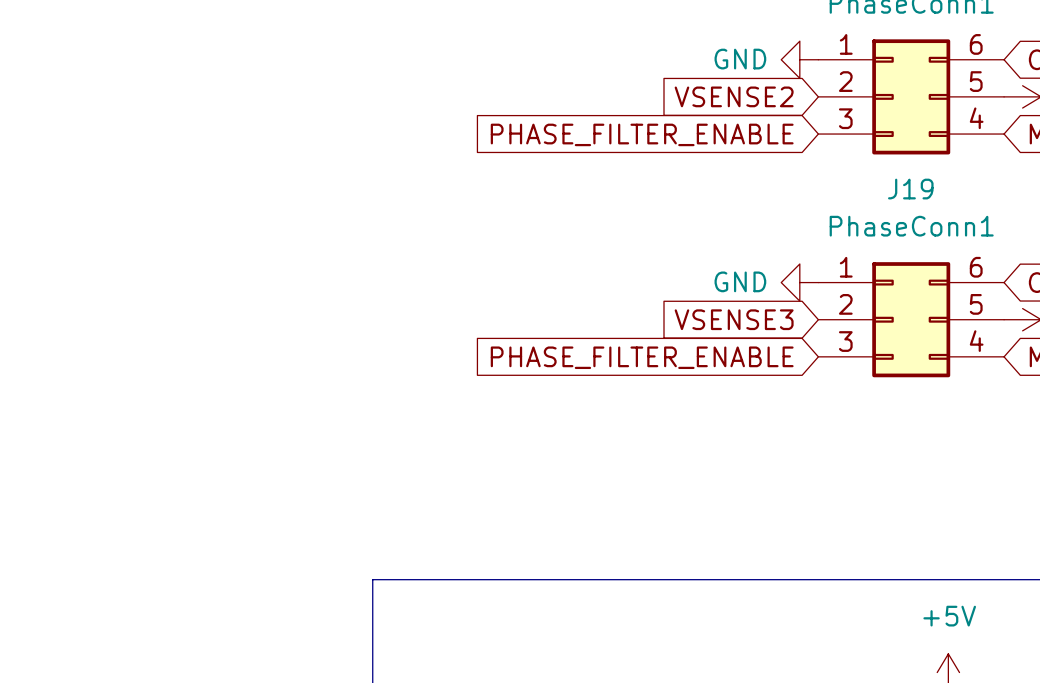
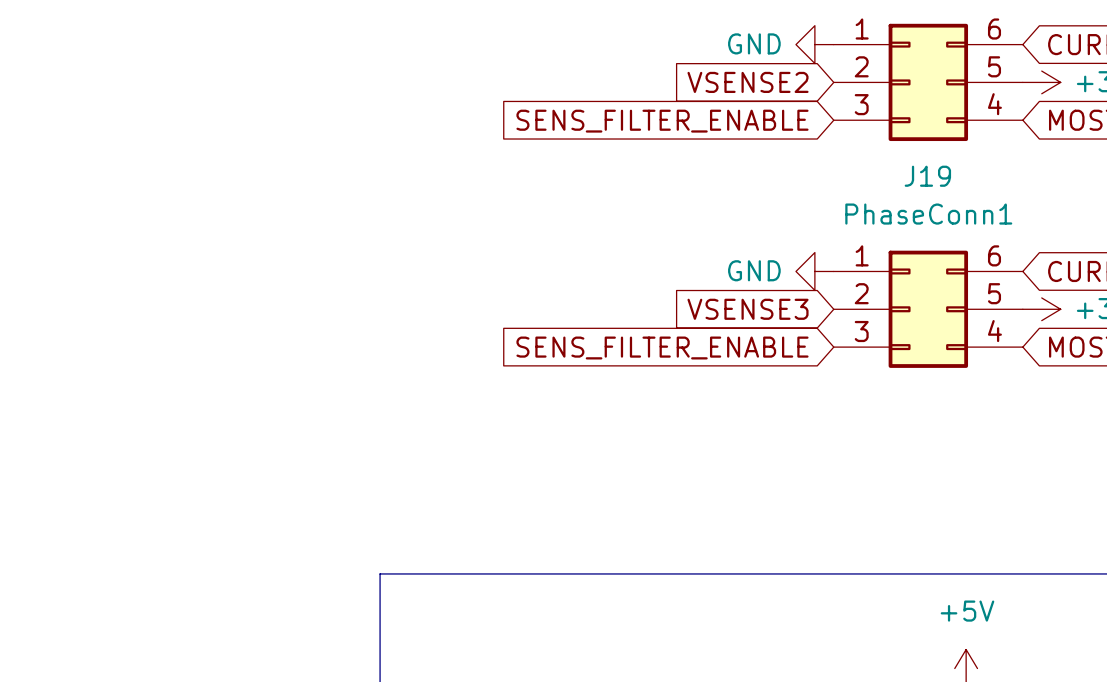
global label: PHASE_FILTER_ENABLE (642, 134) -> SENS_FILTER_ENABLE (662, 121)
global label: PHASE_FILTER_ENABLE (642, 357) -> SENS_FILTER_ENABLE (662, 348)

